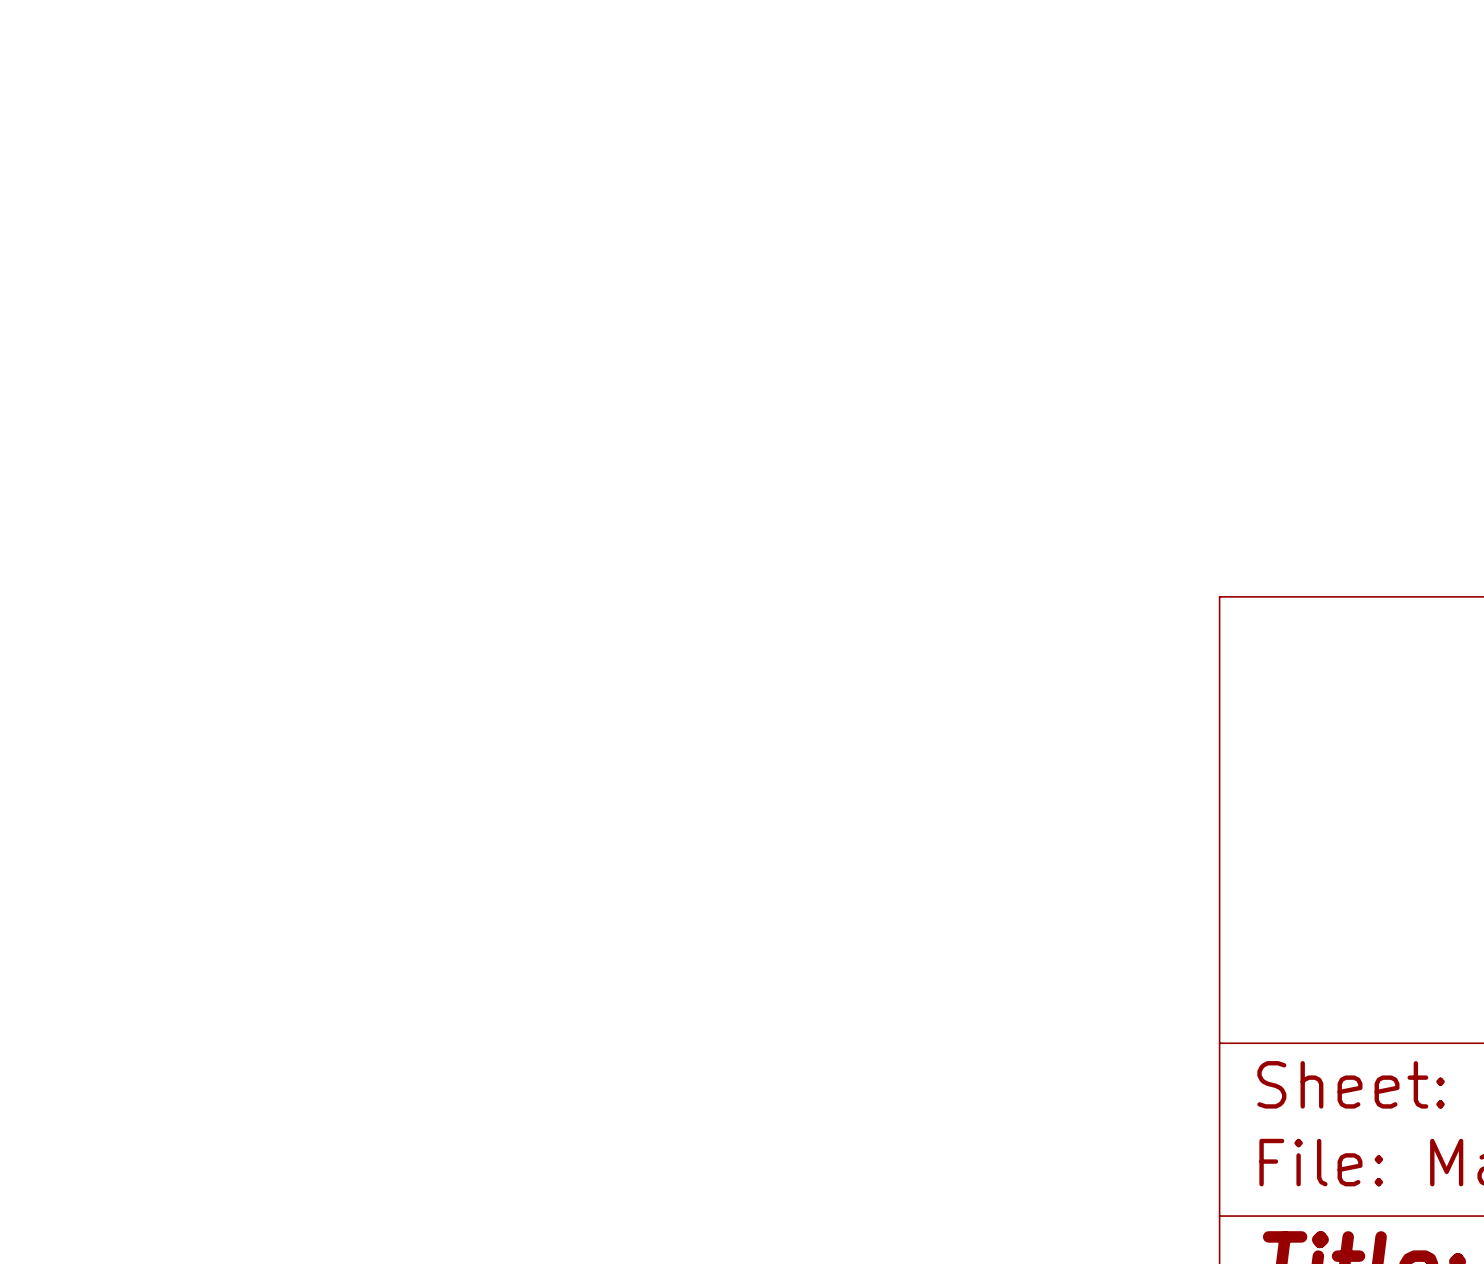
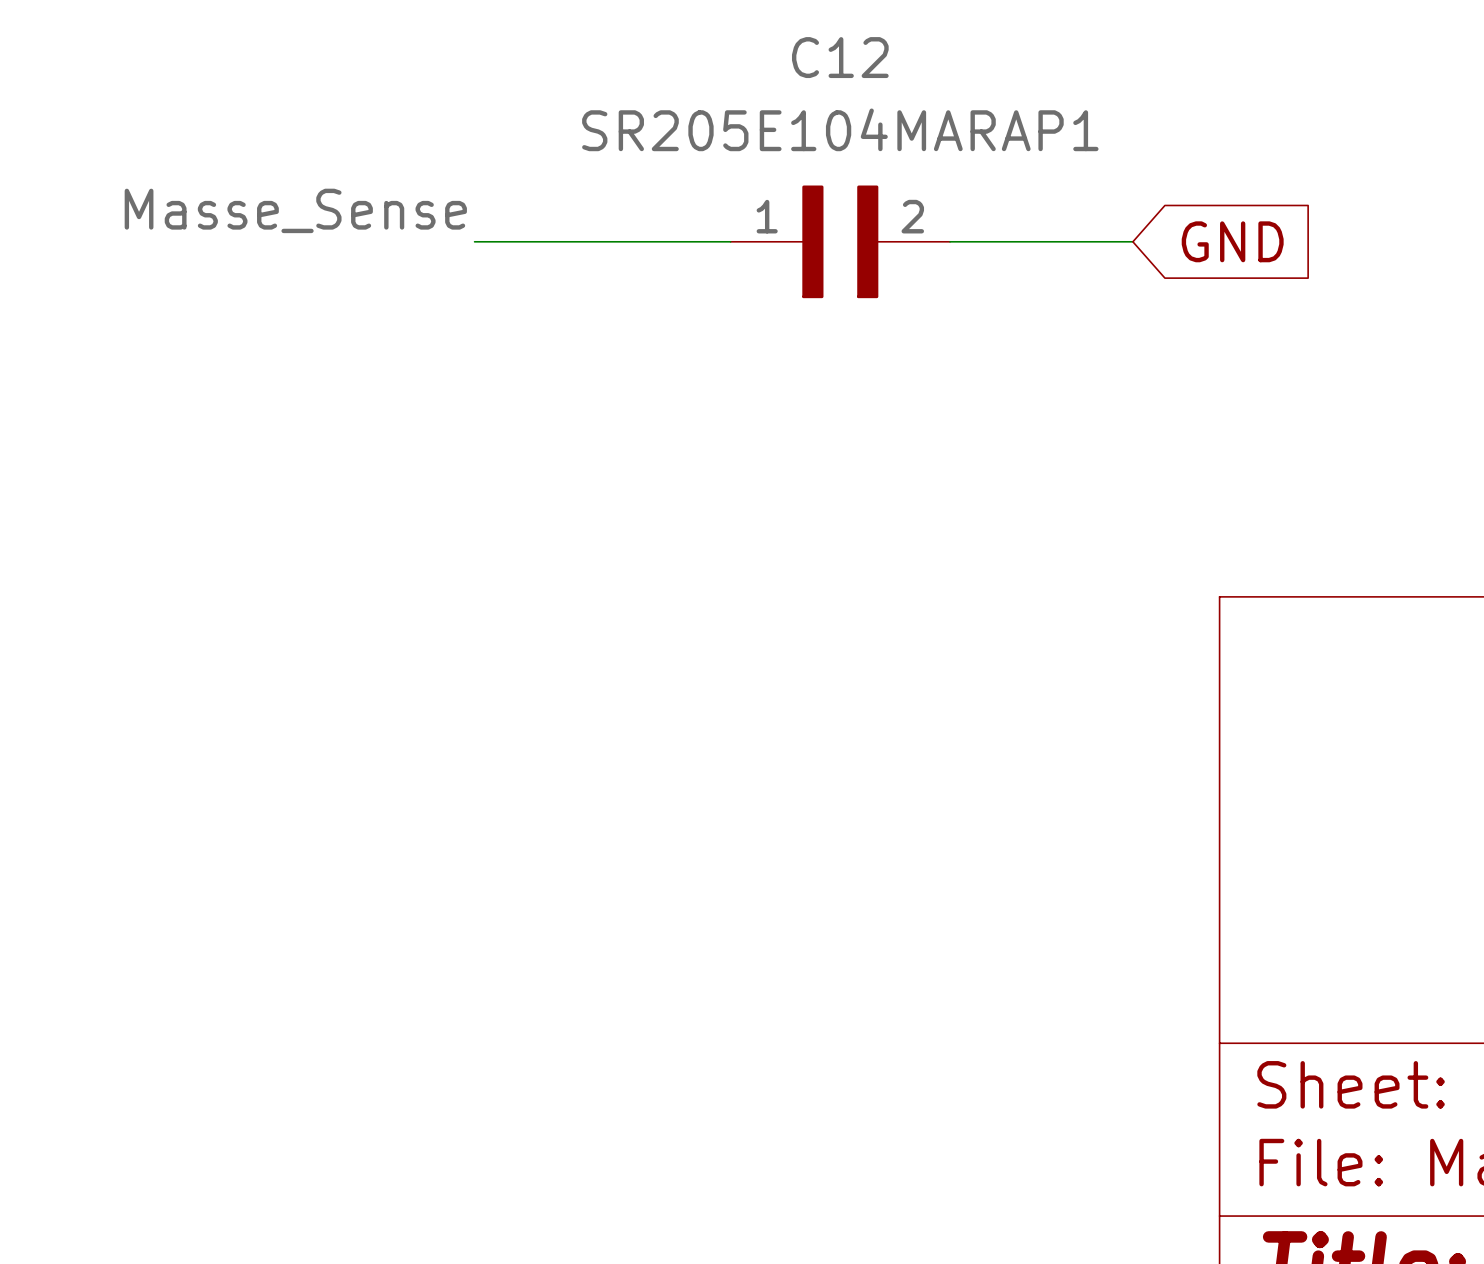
label: none -> Masse_Sense (295, 210)
wire: none -> (474, 241) (730, 241)
C12: none -> SR205E104MARAP1 (840, 241)
wire: none -> (950, 241) (1132, 241)
global label: none -> GND (1232, 241)

